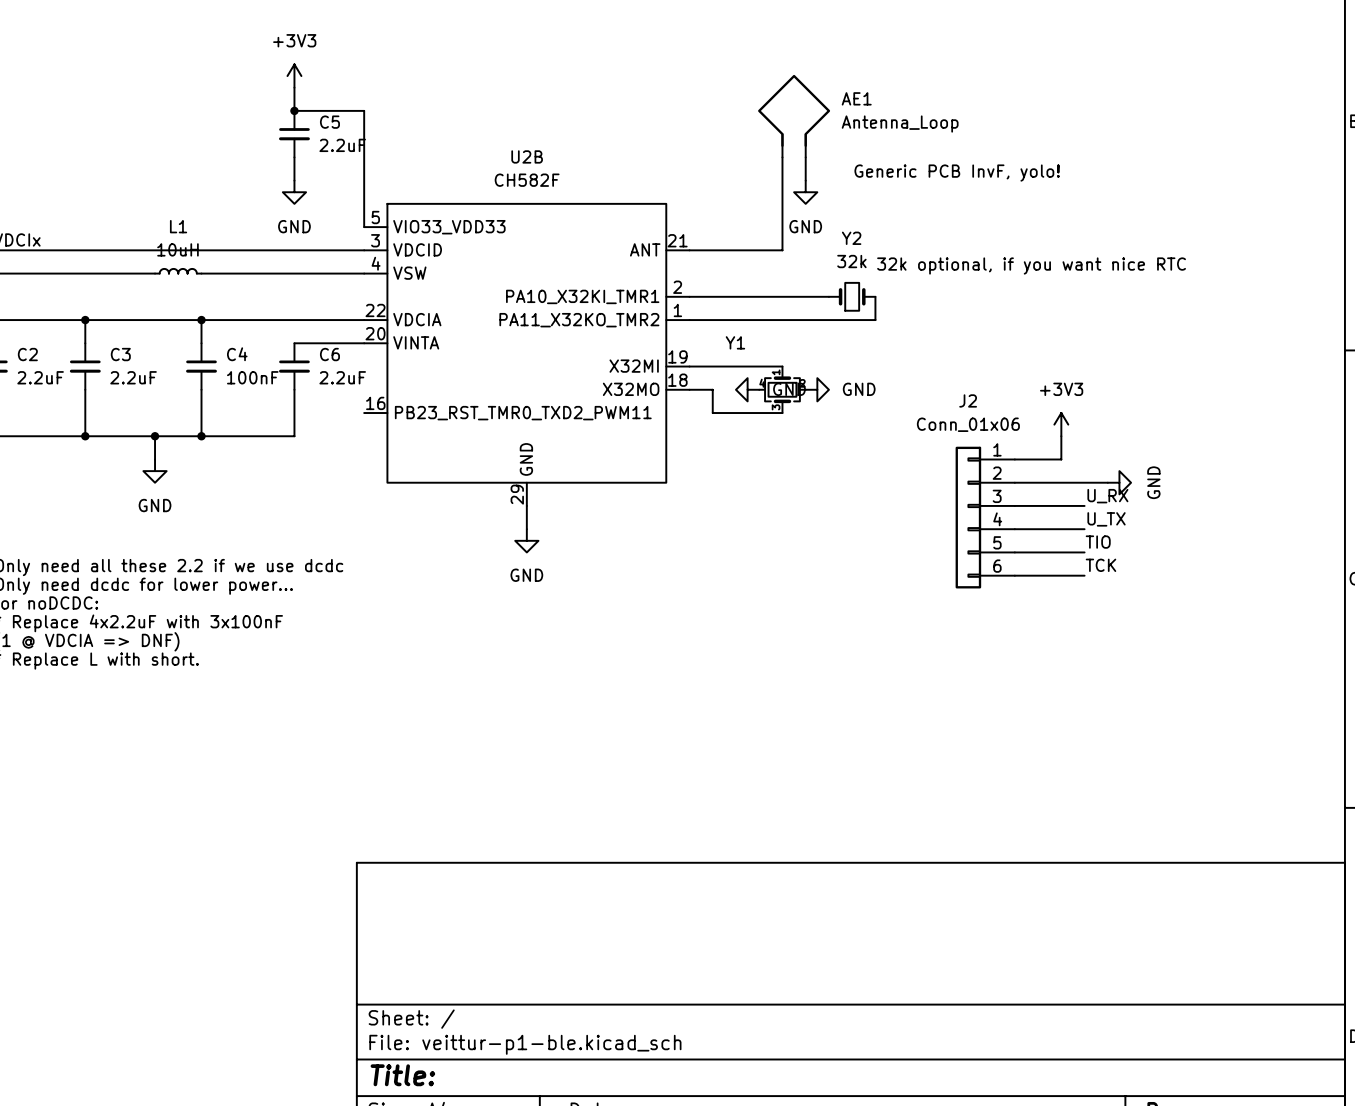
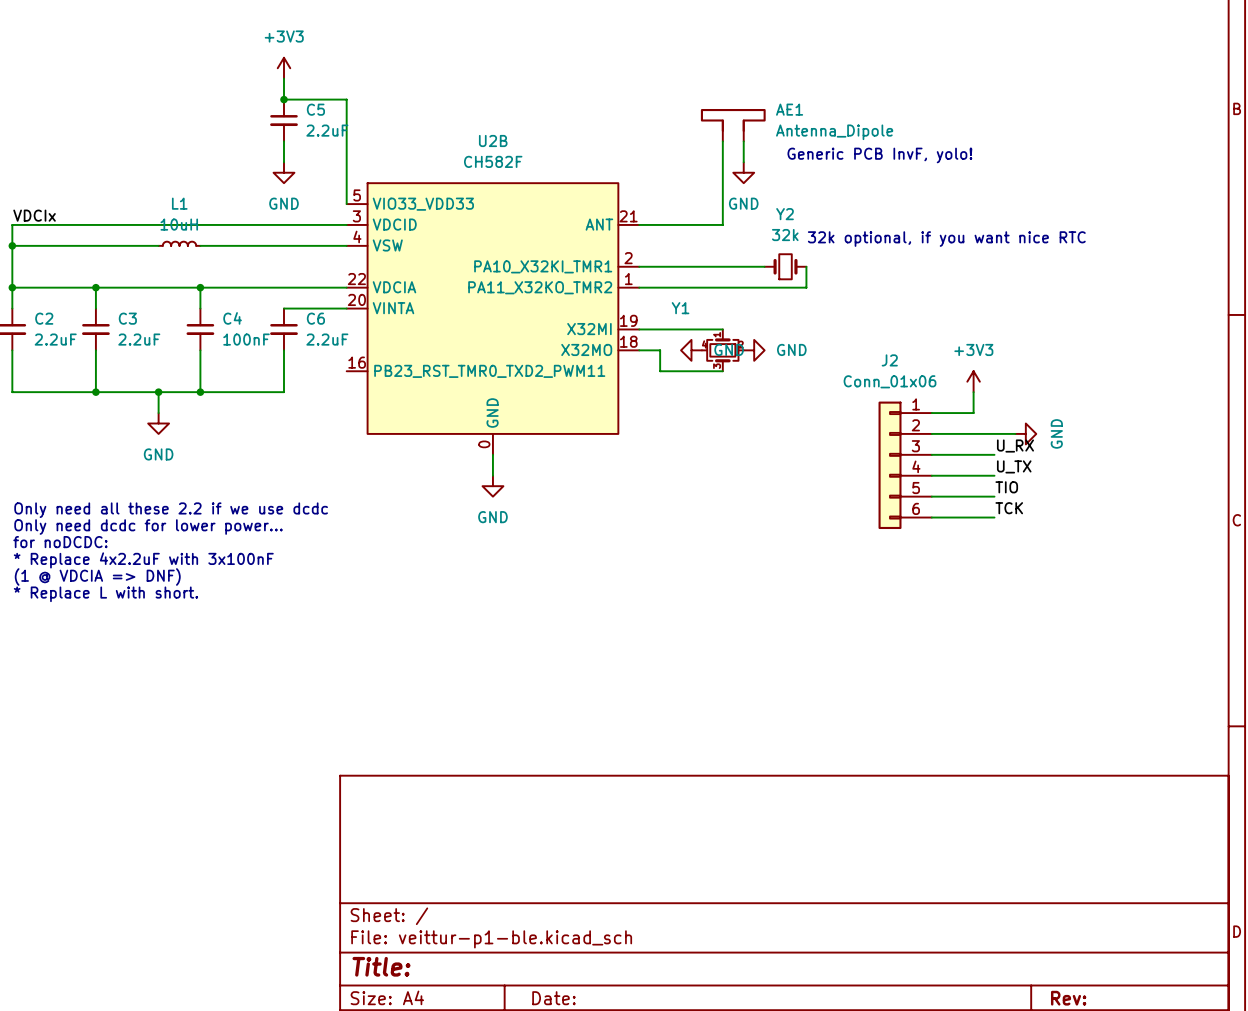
AE1 symbol: [758, 74, 831, 158] -> [700, 108, 766, 142]
AE1 value: Antenna_Loop (900, 124) -> Antenna_Dipole (834, 132)
U2B pin number: 29 (517, 494) -> 0 (484, 444)

